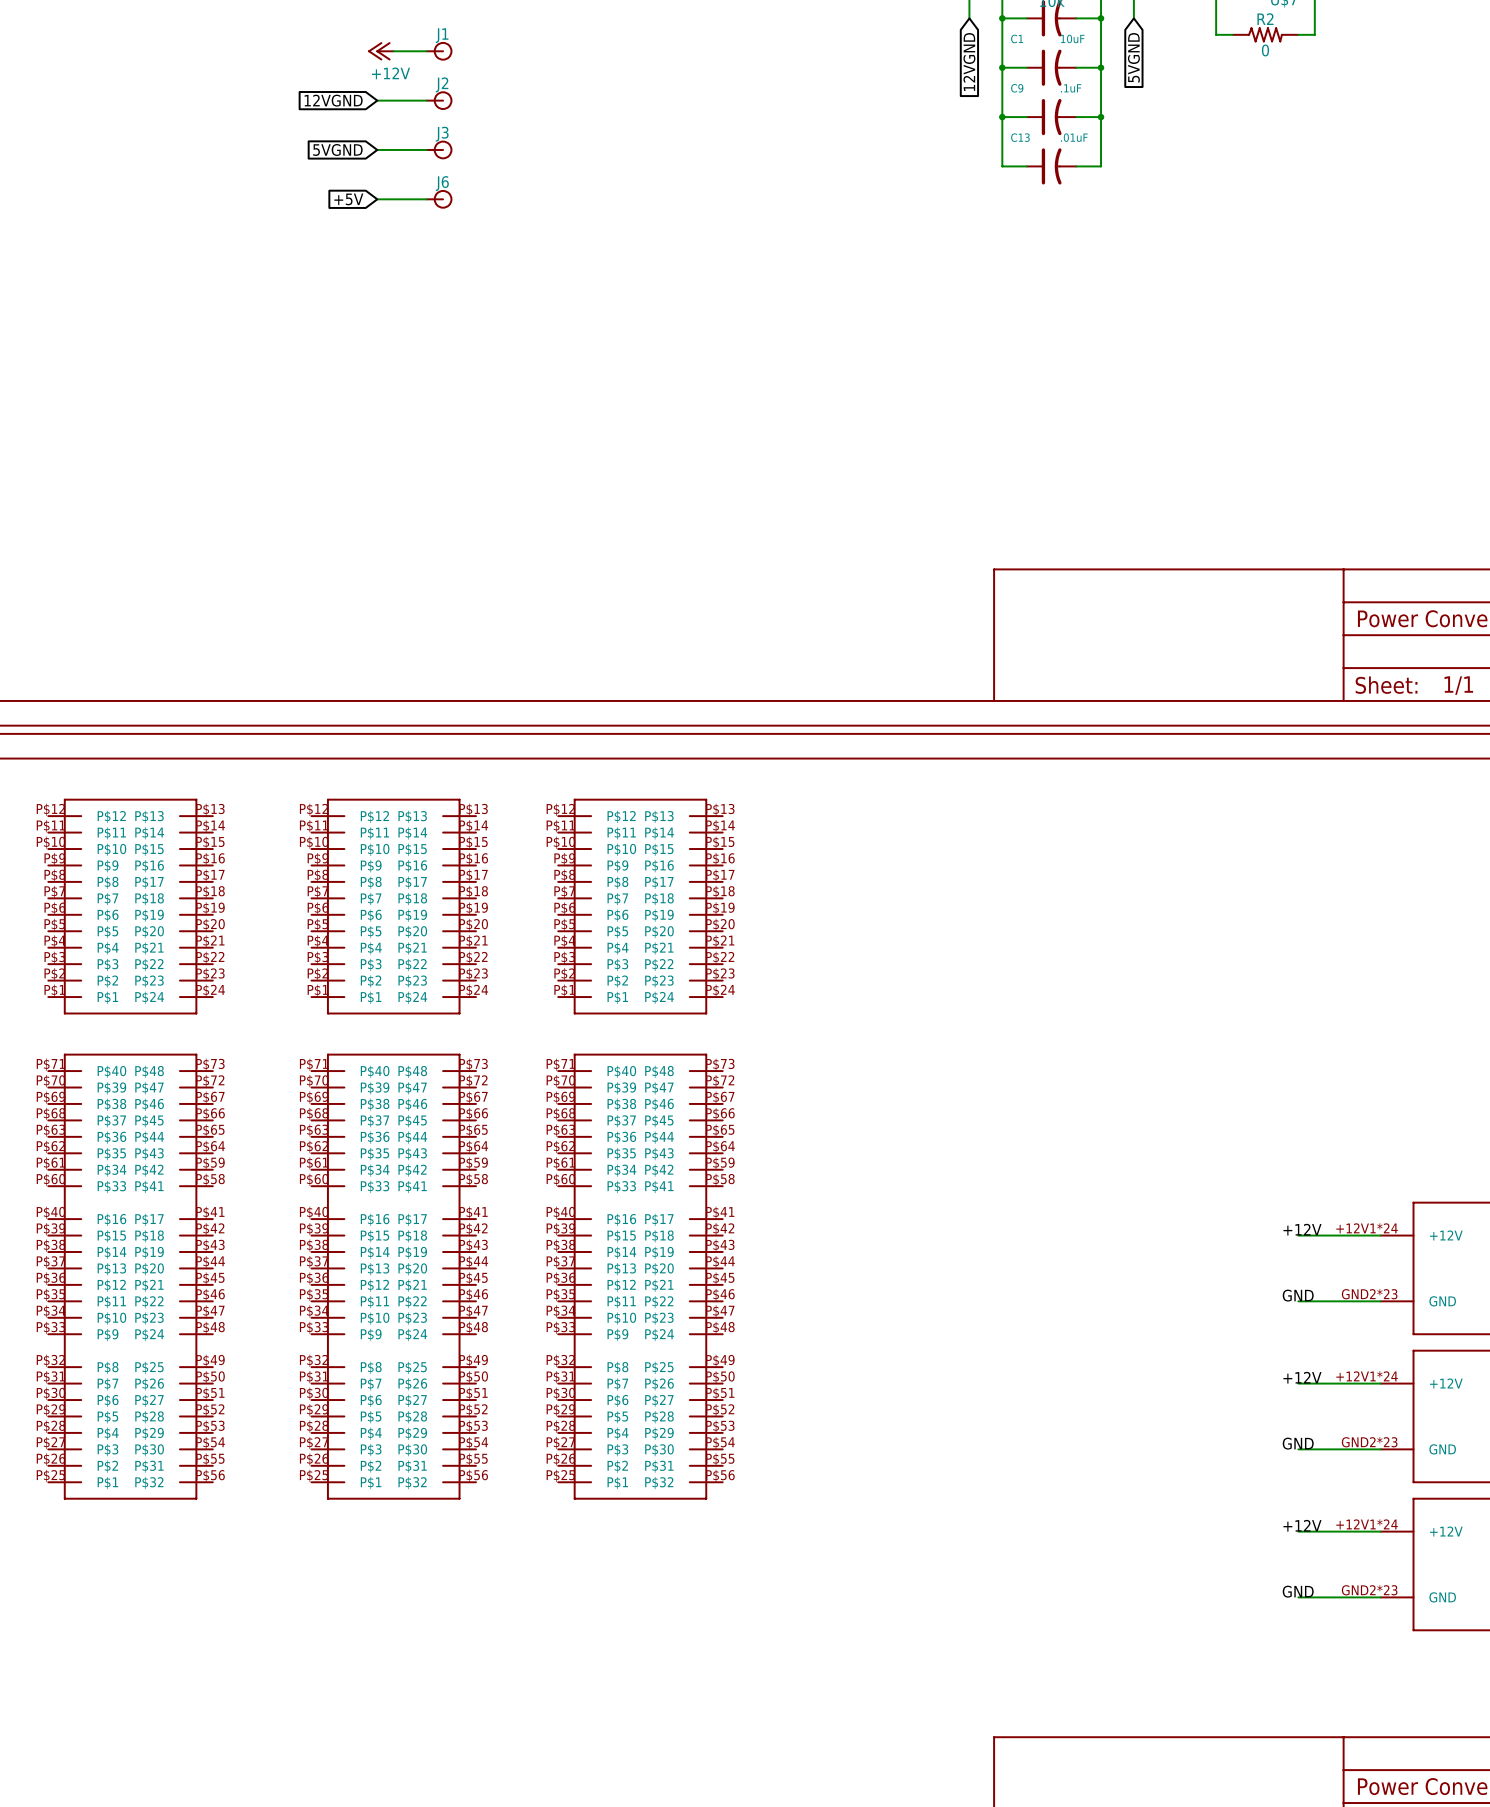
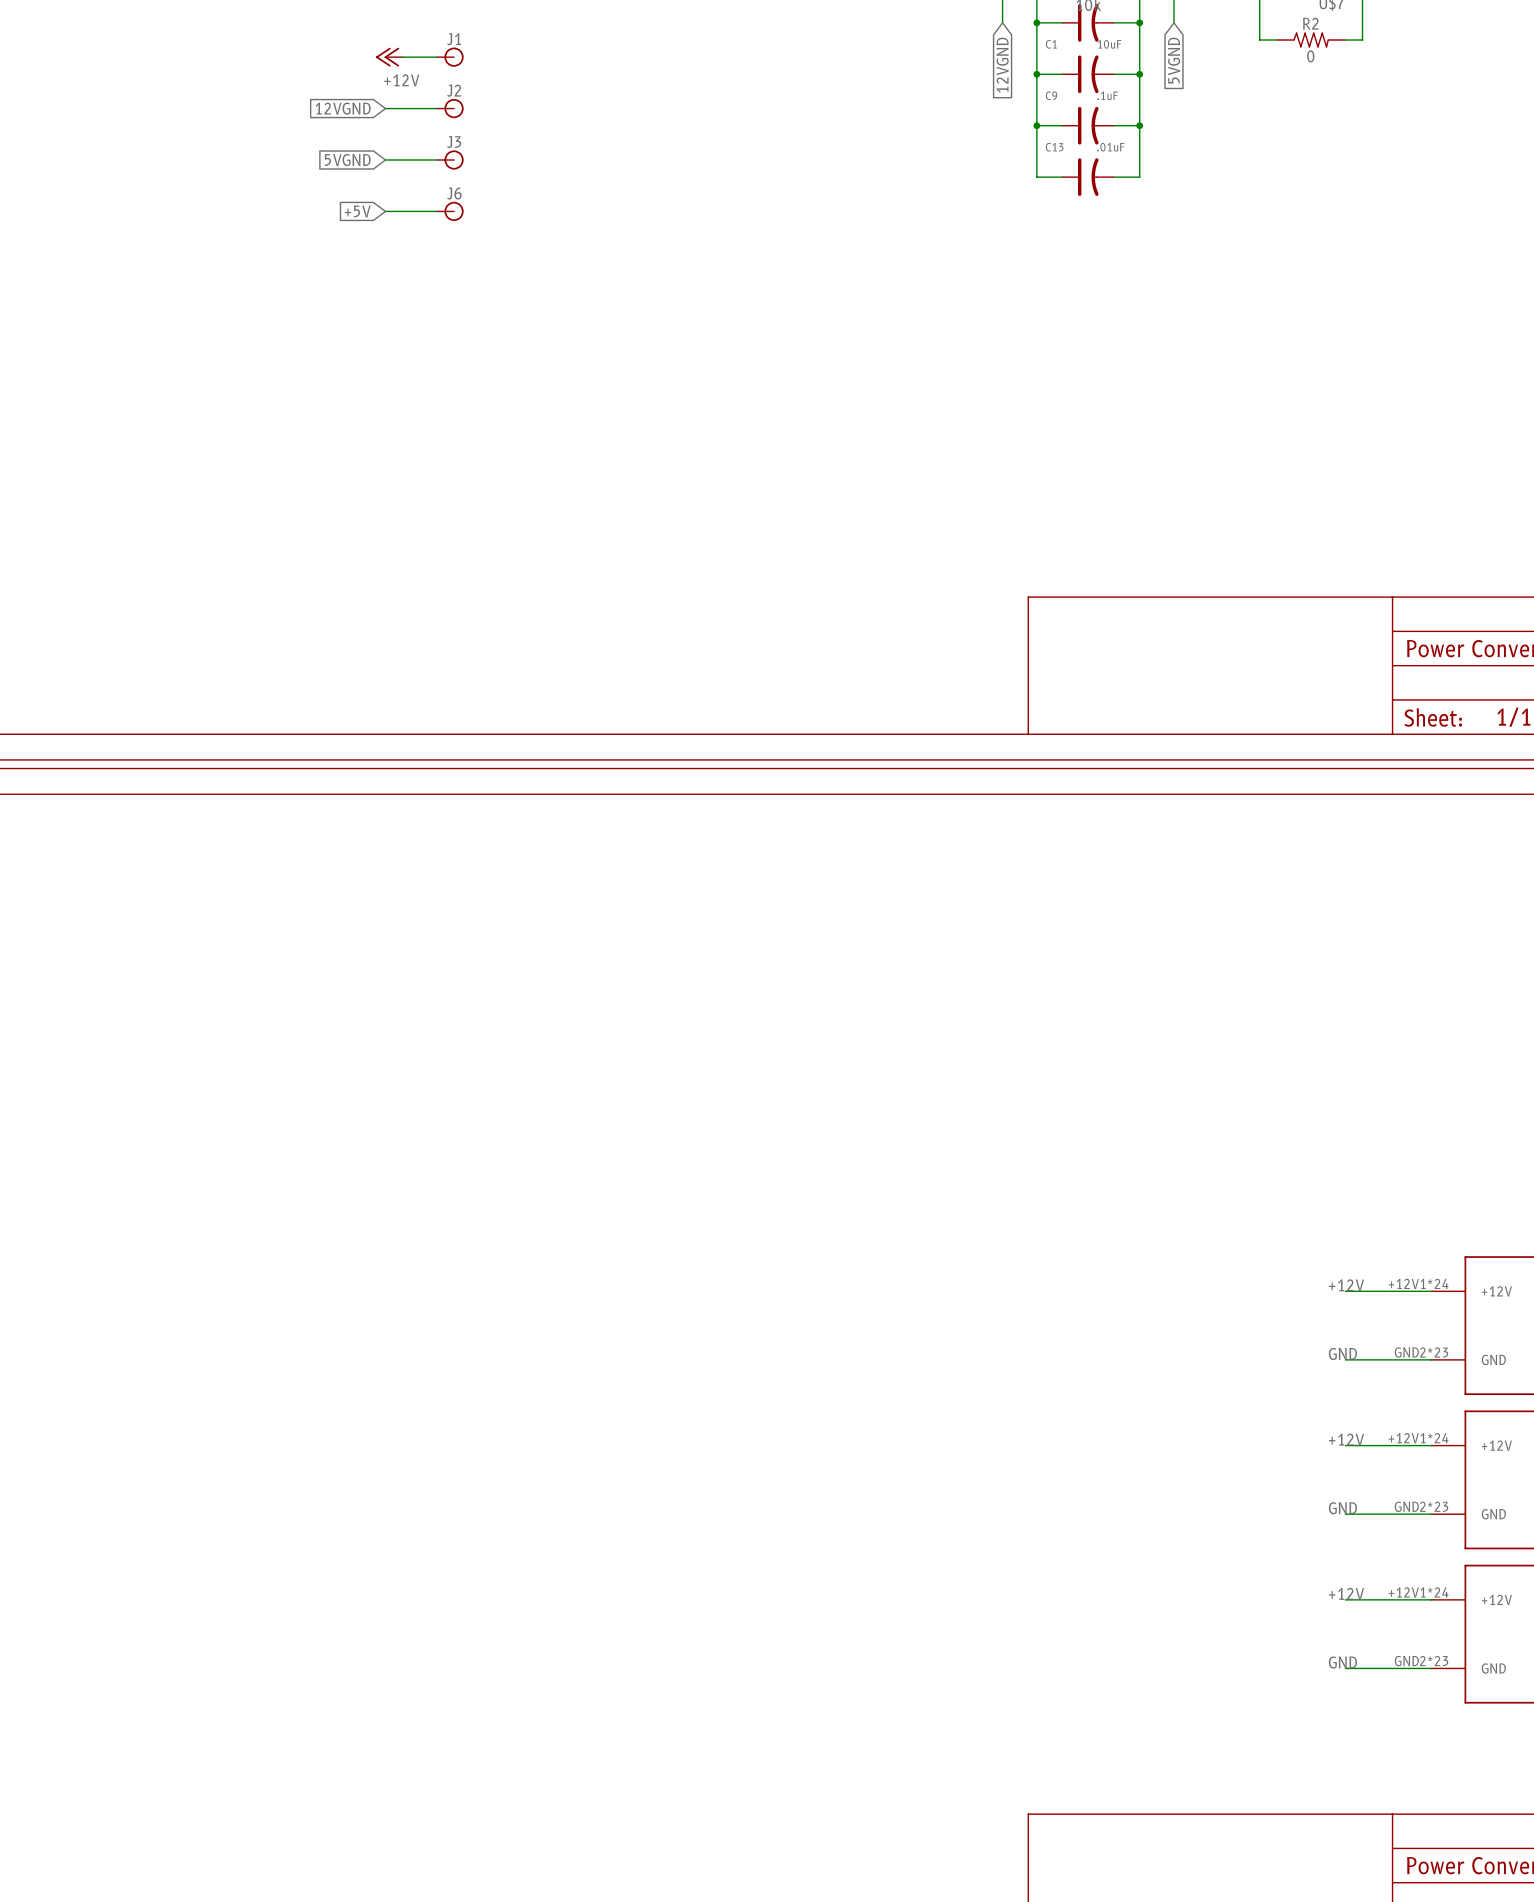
part: (130, 906) -> none
part: (393, 906) -> none
part: (640, 906) -> none
part: (130, 1276) -> none
part: (393, 1276) -> none
part: (640, 1276) -> none

